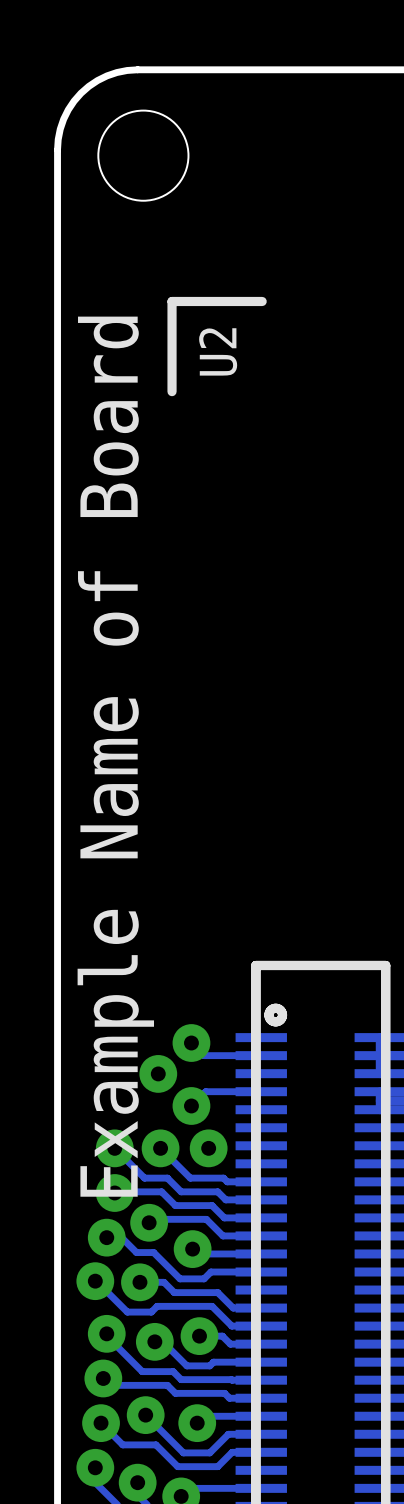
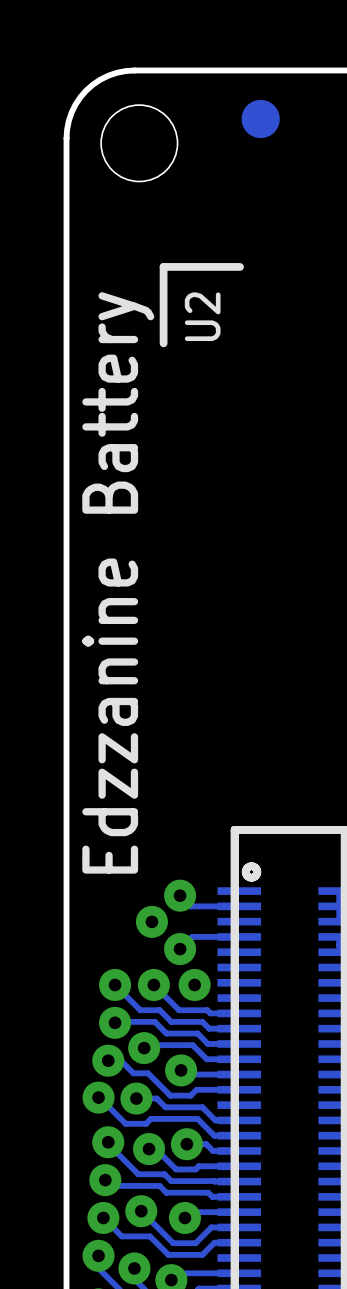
part: none -> (260, 119)
text: none -> Edzzanine Battery (118, 582)
text: Example Name of Board (115, 756) -> none

